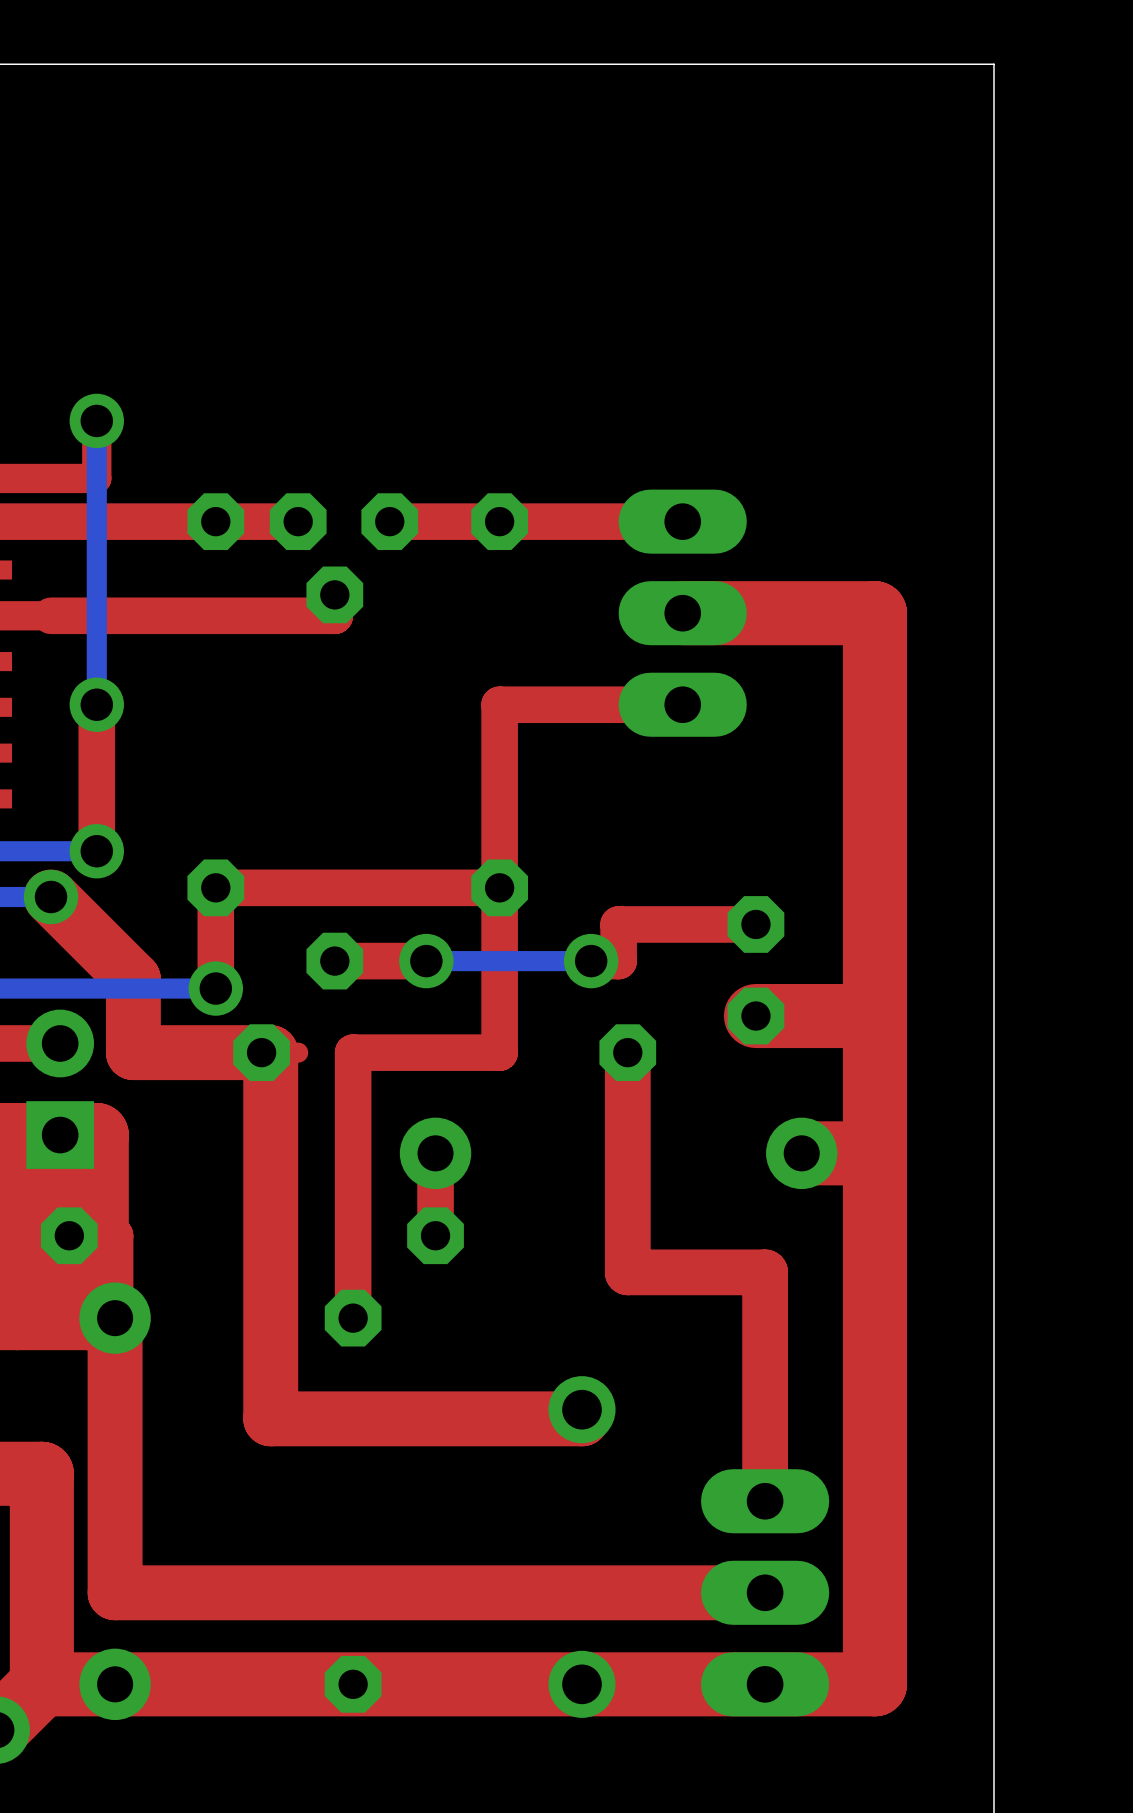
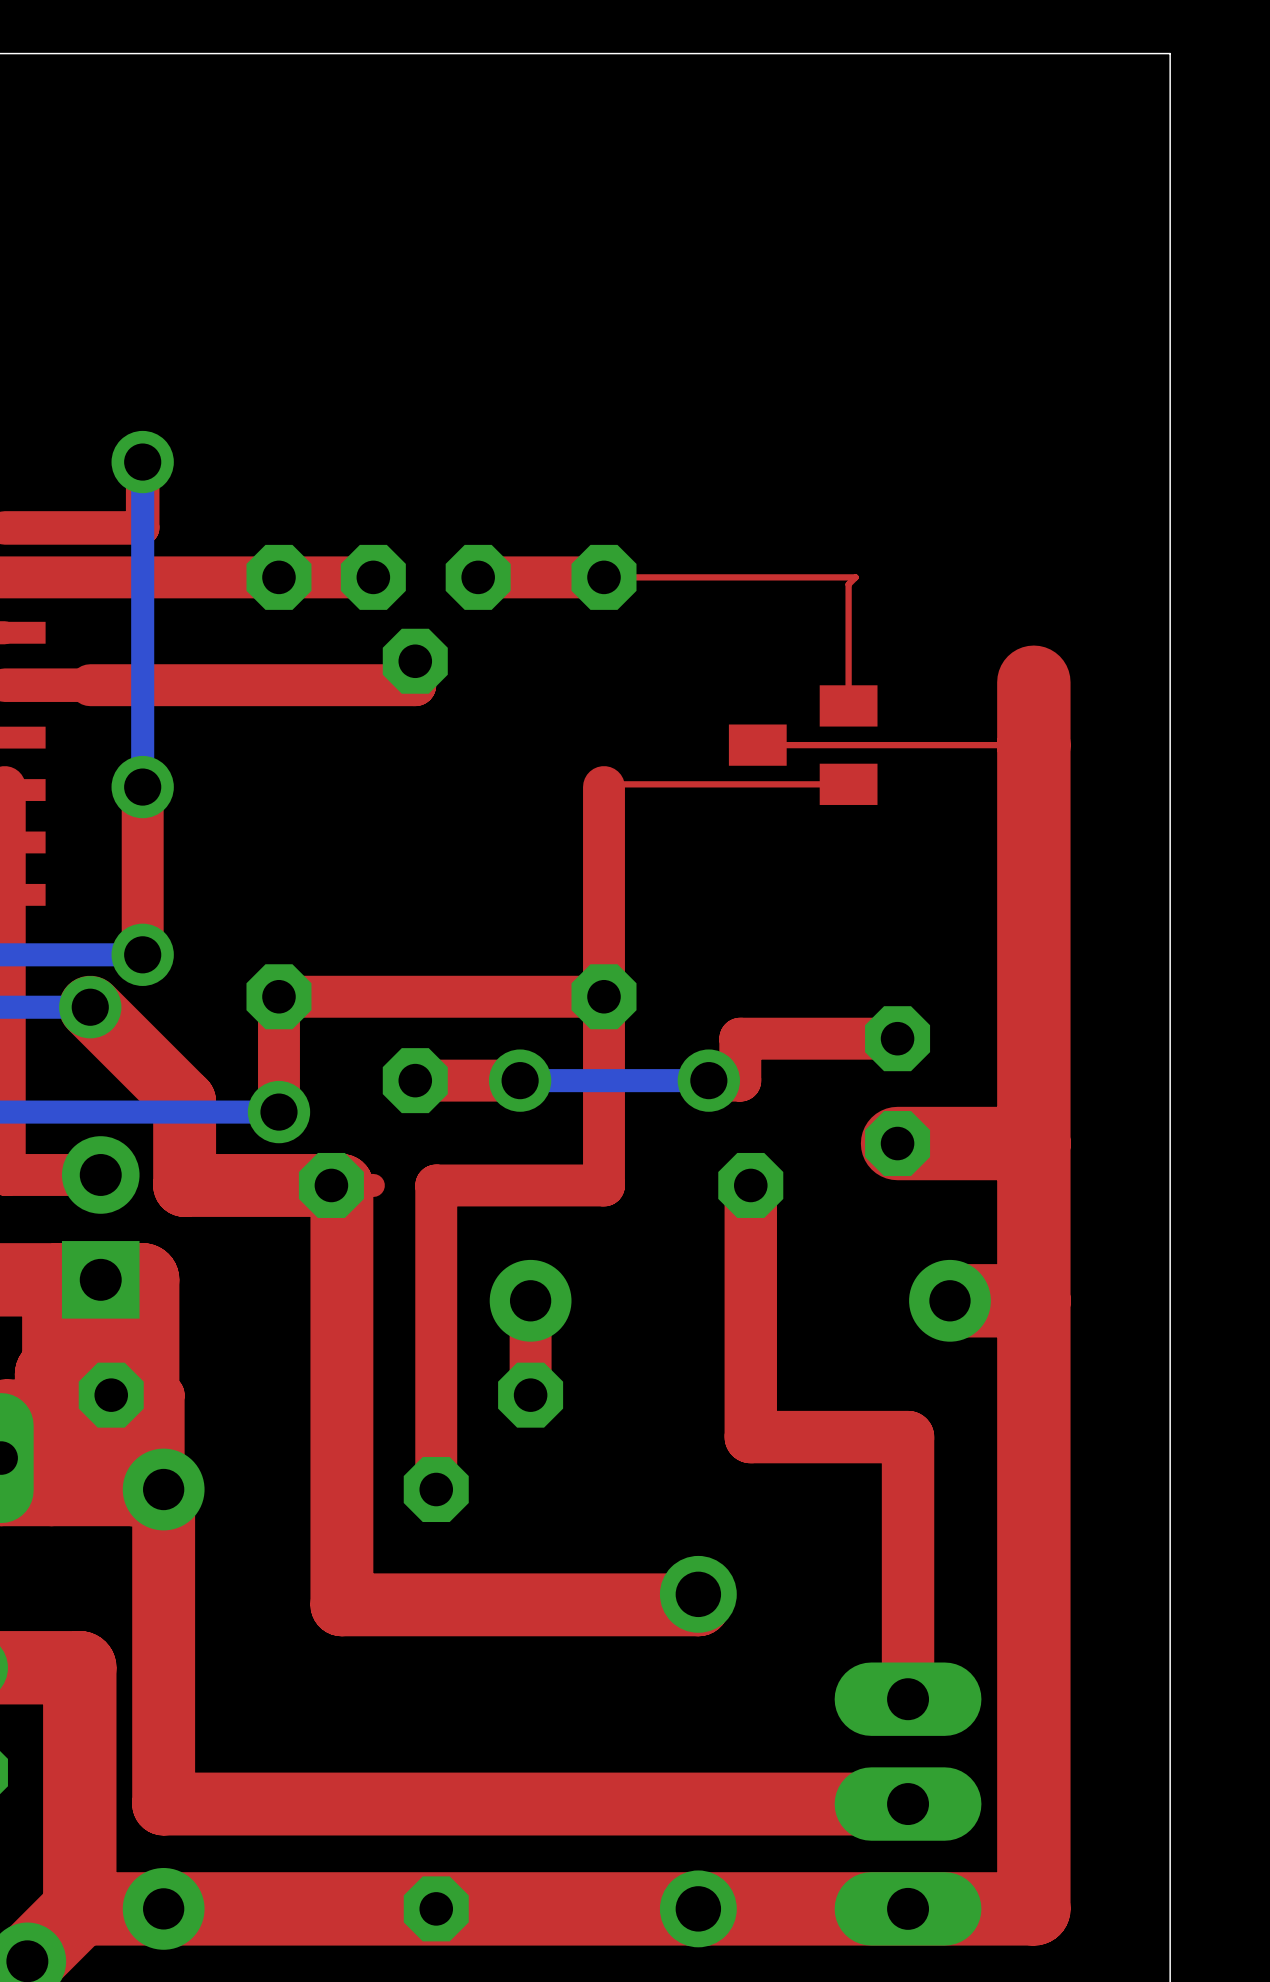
top track: none -> (813, 577) (855, 577) (848, 584) (848, 705)
top track width: thick (682, 521) (499, 521) (682, 521) -> thin (813, 577) (604, 577) (813, 577)
part: (682, 613) -> none
top track: (874, 613) (682, 613) -> none
part: none -> (803, 745)
top track: none -> (1033, 745) (757, 745)
top track: (682, 704) (499, 704) -> (848, 784) (606, 784) (604, 787)

